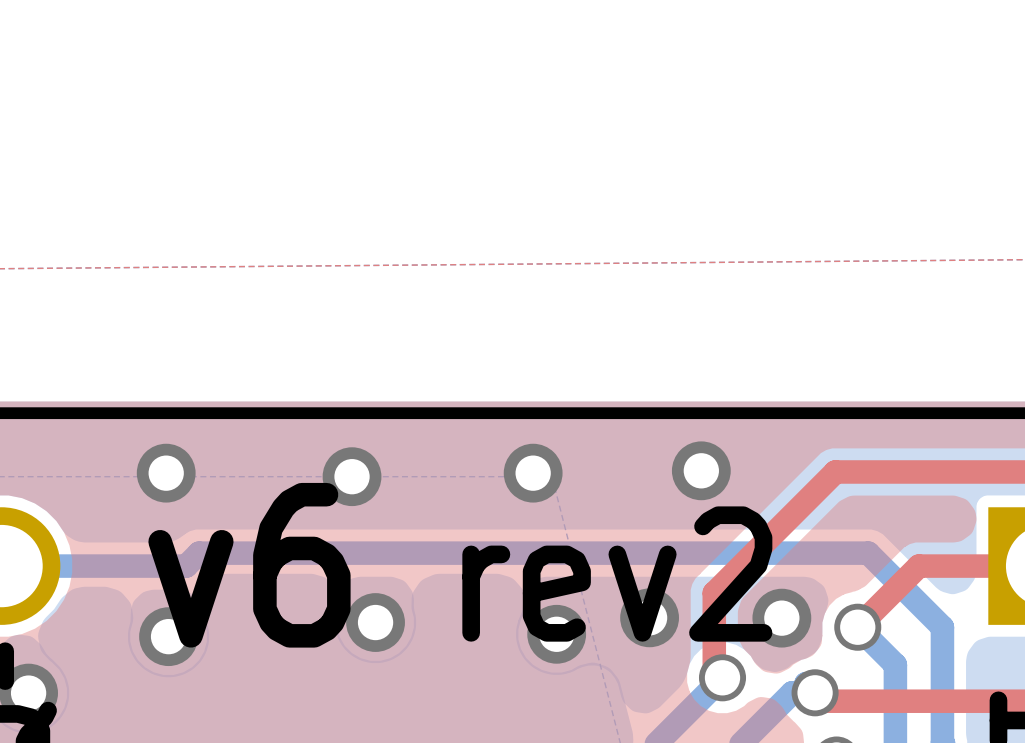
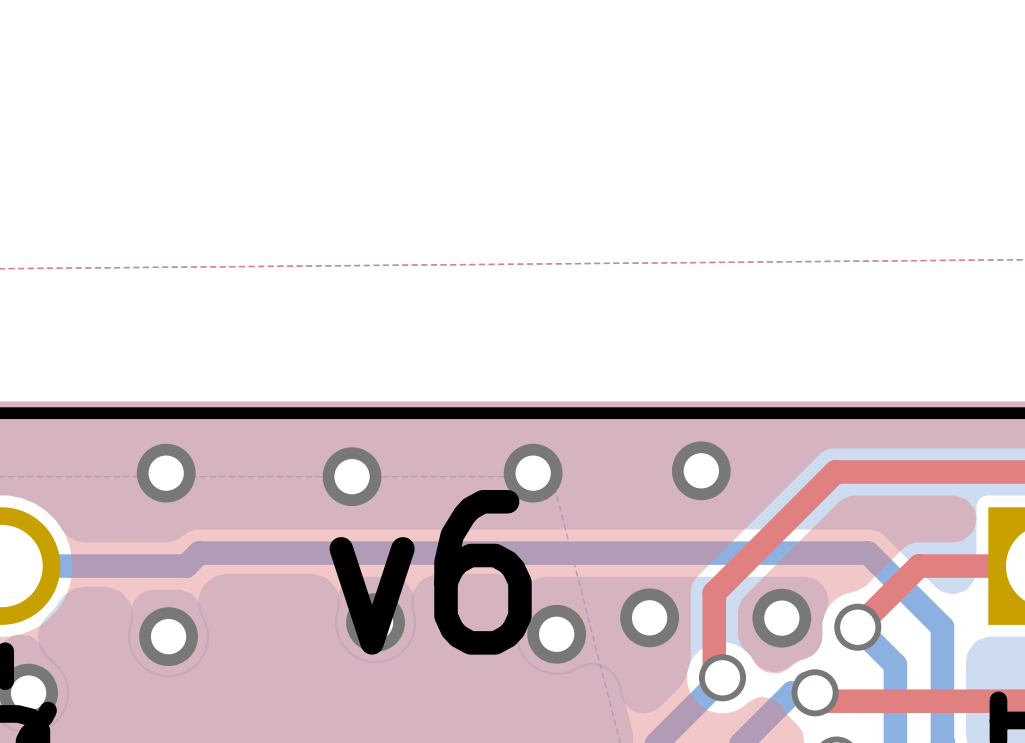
text position: v6 (249, 565) -> v6 (430, 572)
text: rev2 (617, 574) -> none

